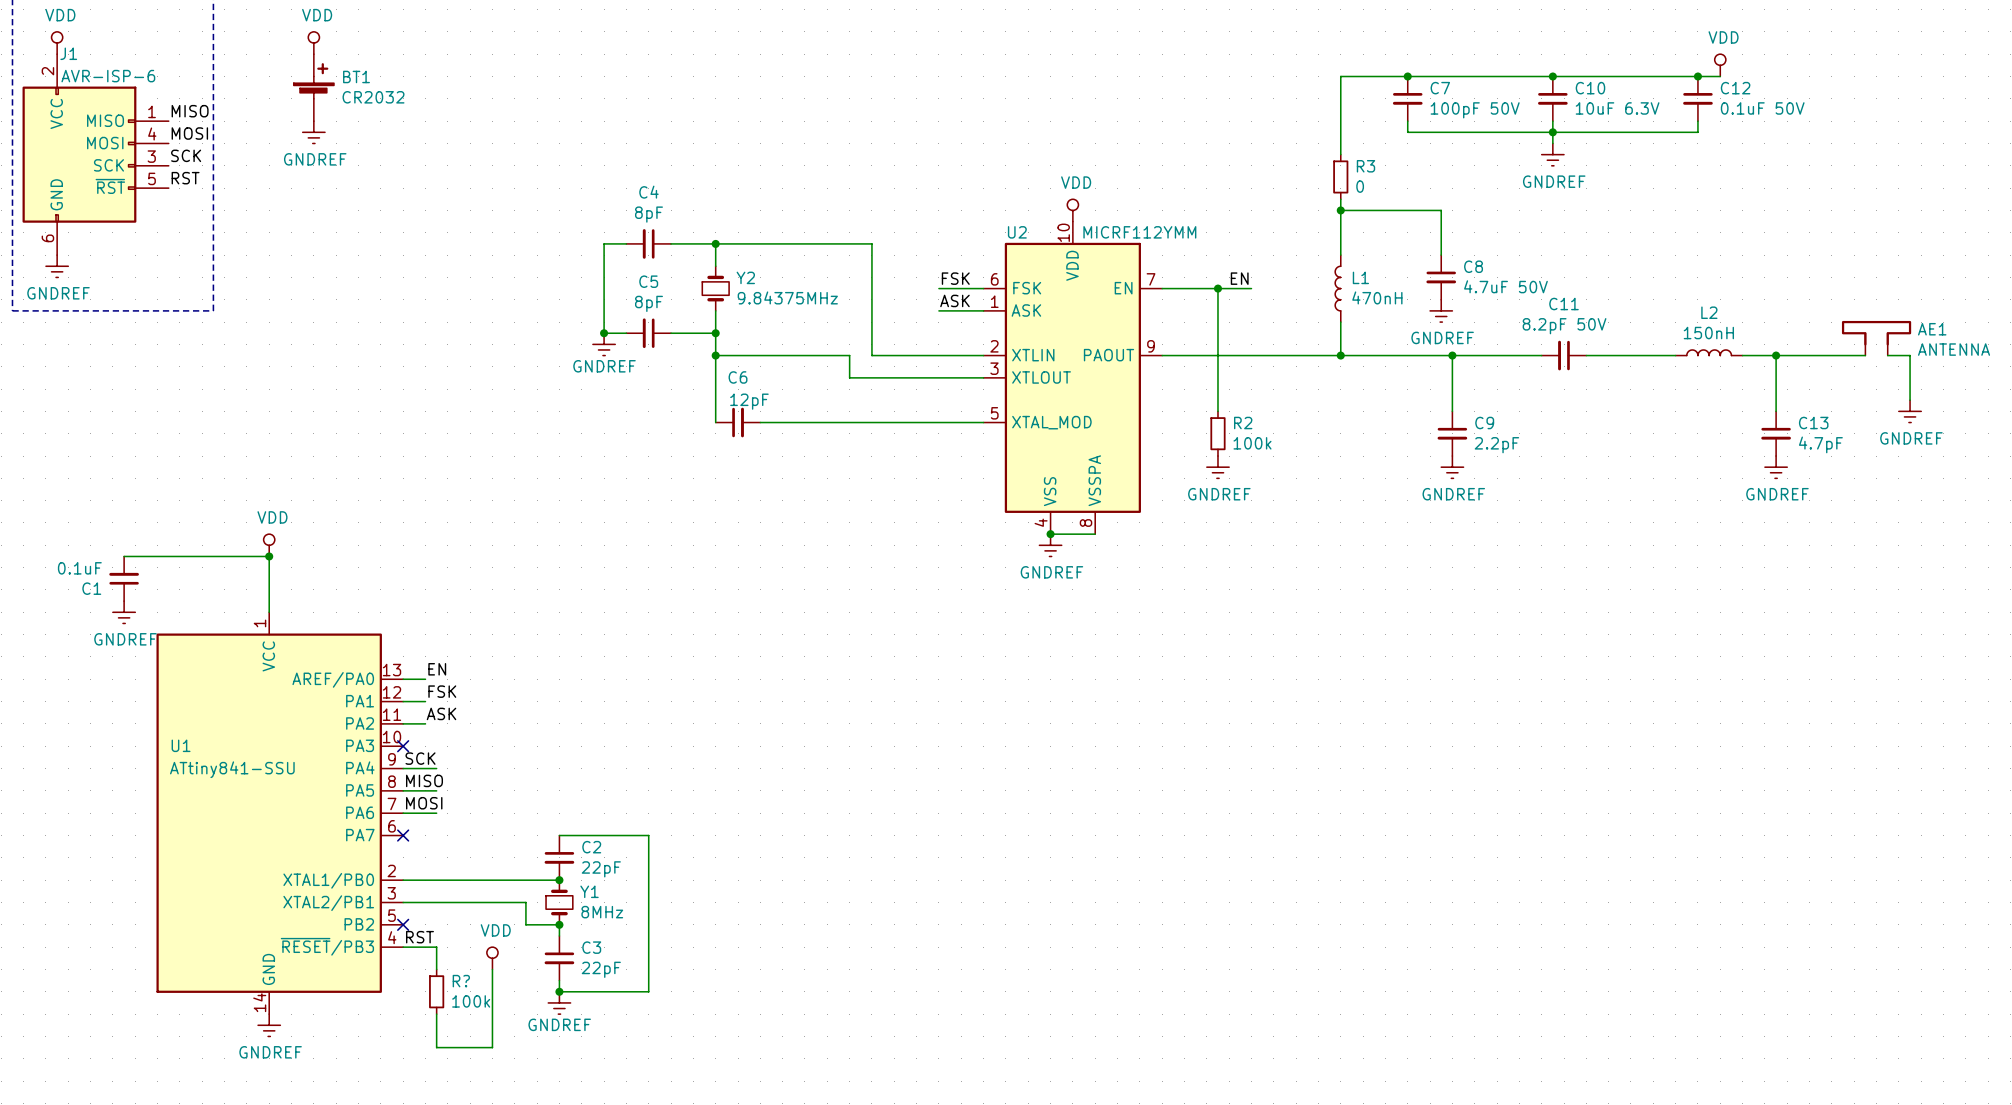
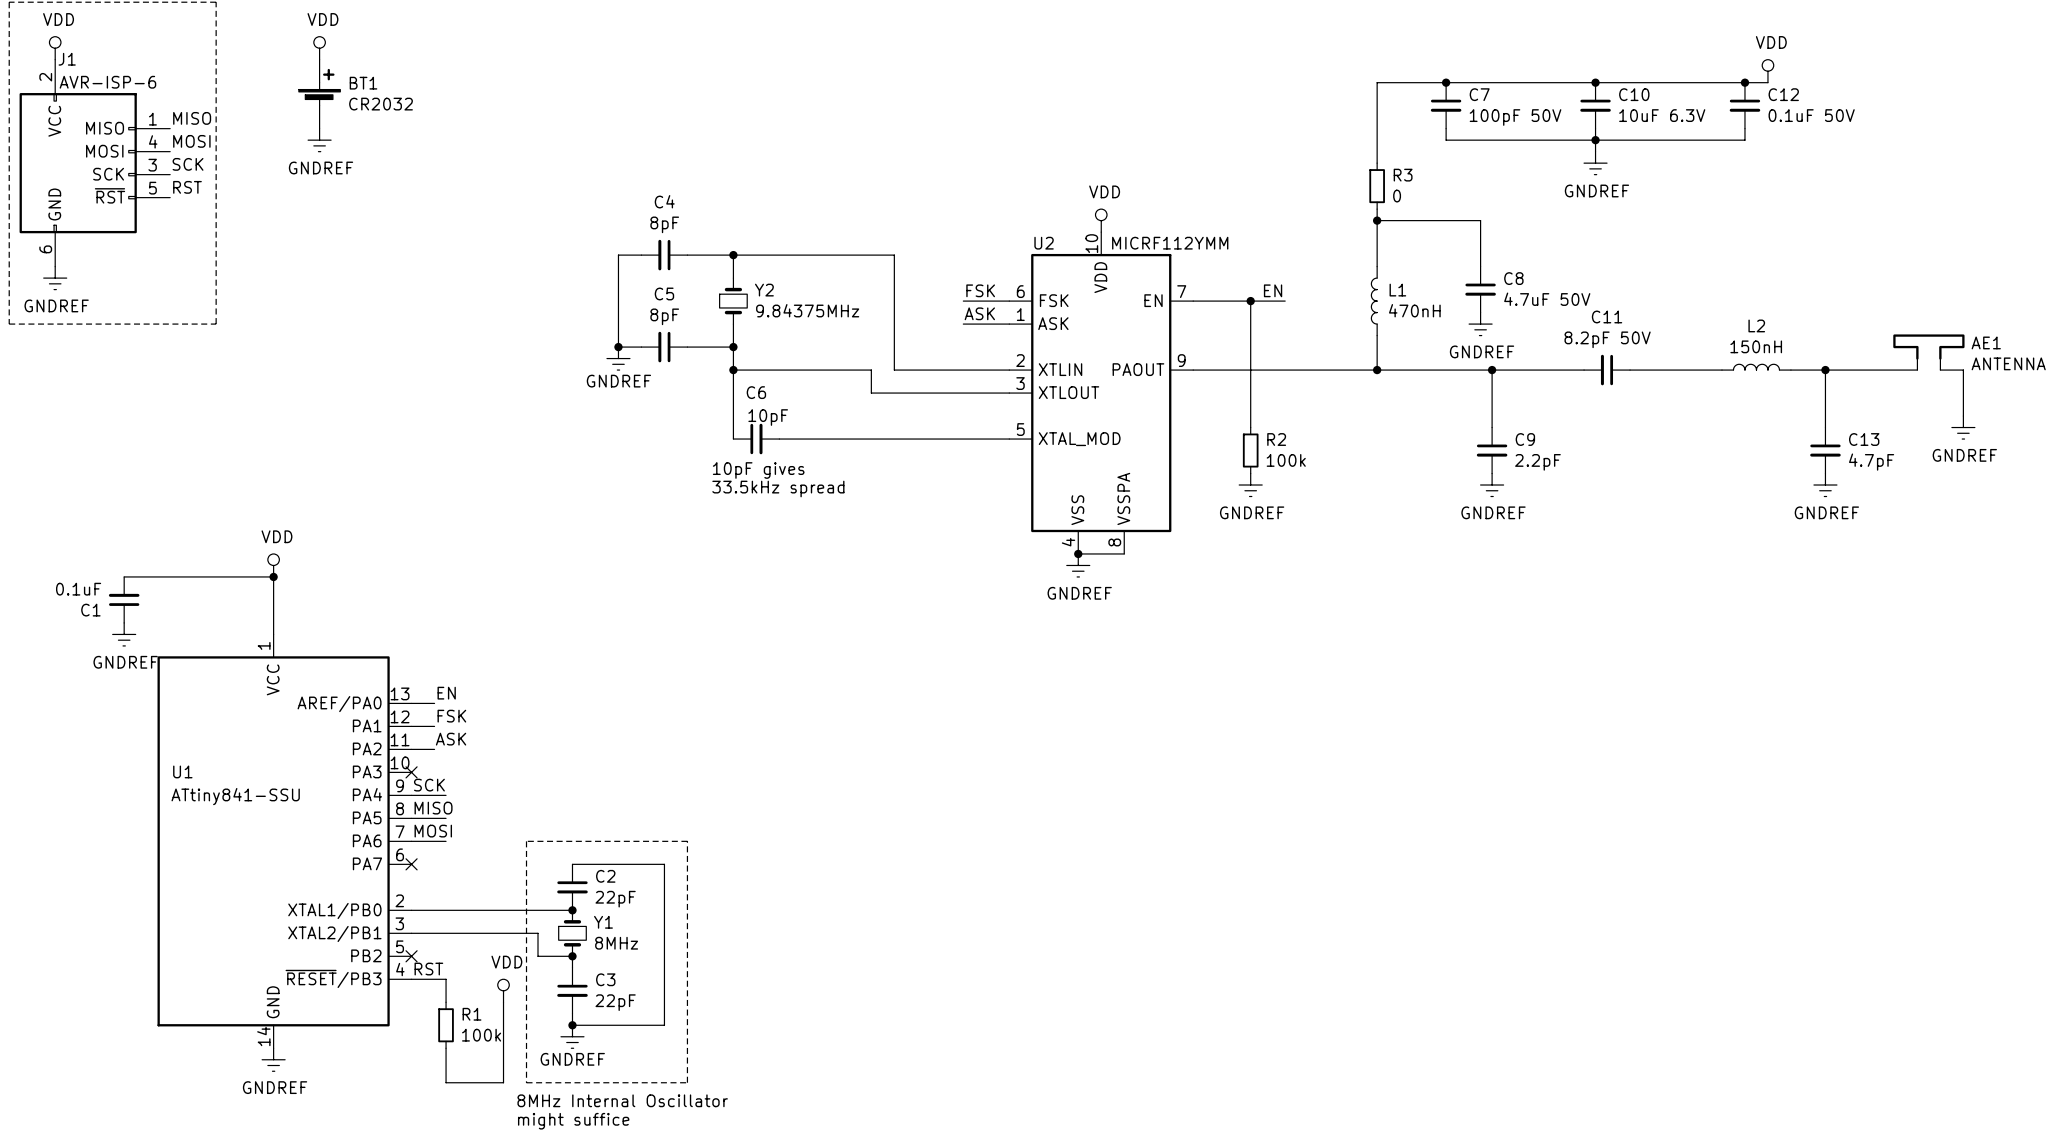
C6 value: 12pF (749, 401) -> 10pF (768, 417)
text: none -> 10pF gives (758, 470)
text: none -> 33.5kHz spread (778, 489)
line: none -> (526, 841) (526, 1082) (687, 1082) (687, 841) (526, 841)
R? name: R? (461, 981) -> R1 (472, 1014)
text: none -> 8MHz Internal Oscillator (622, 1100)
text: none -> might suffice (573, 1121)

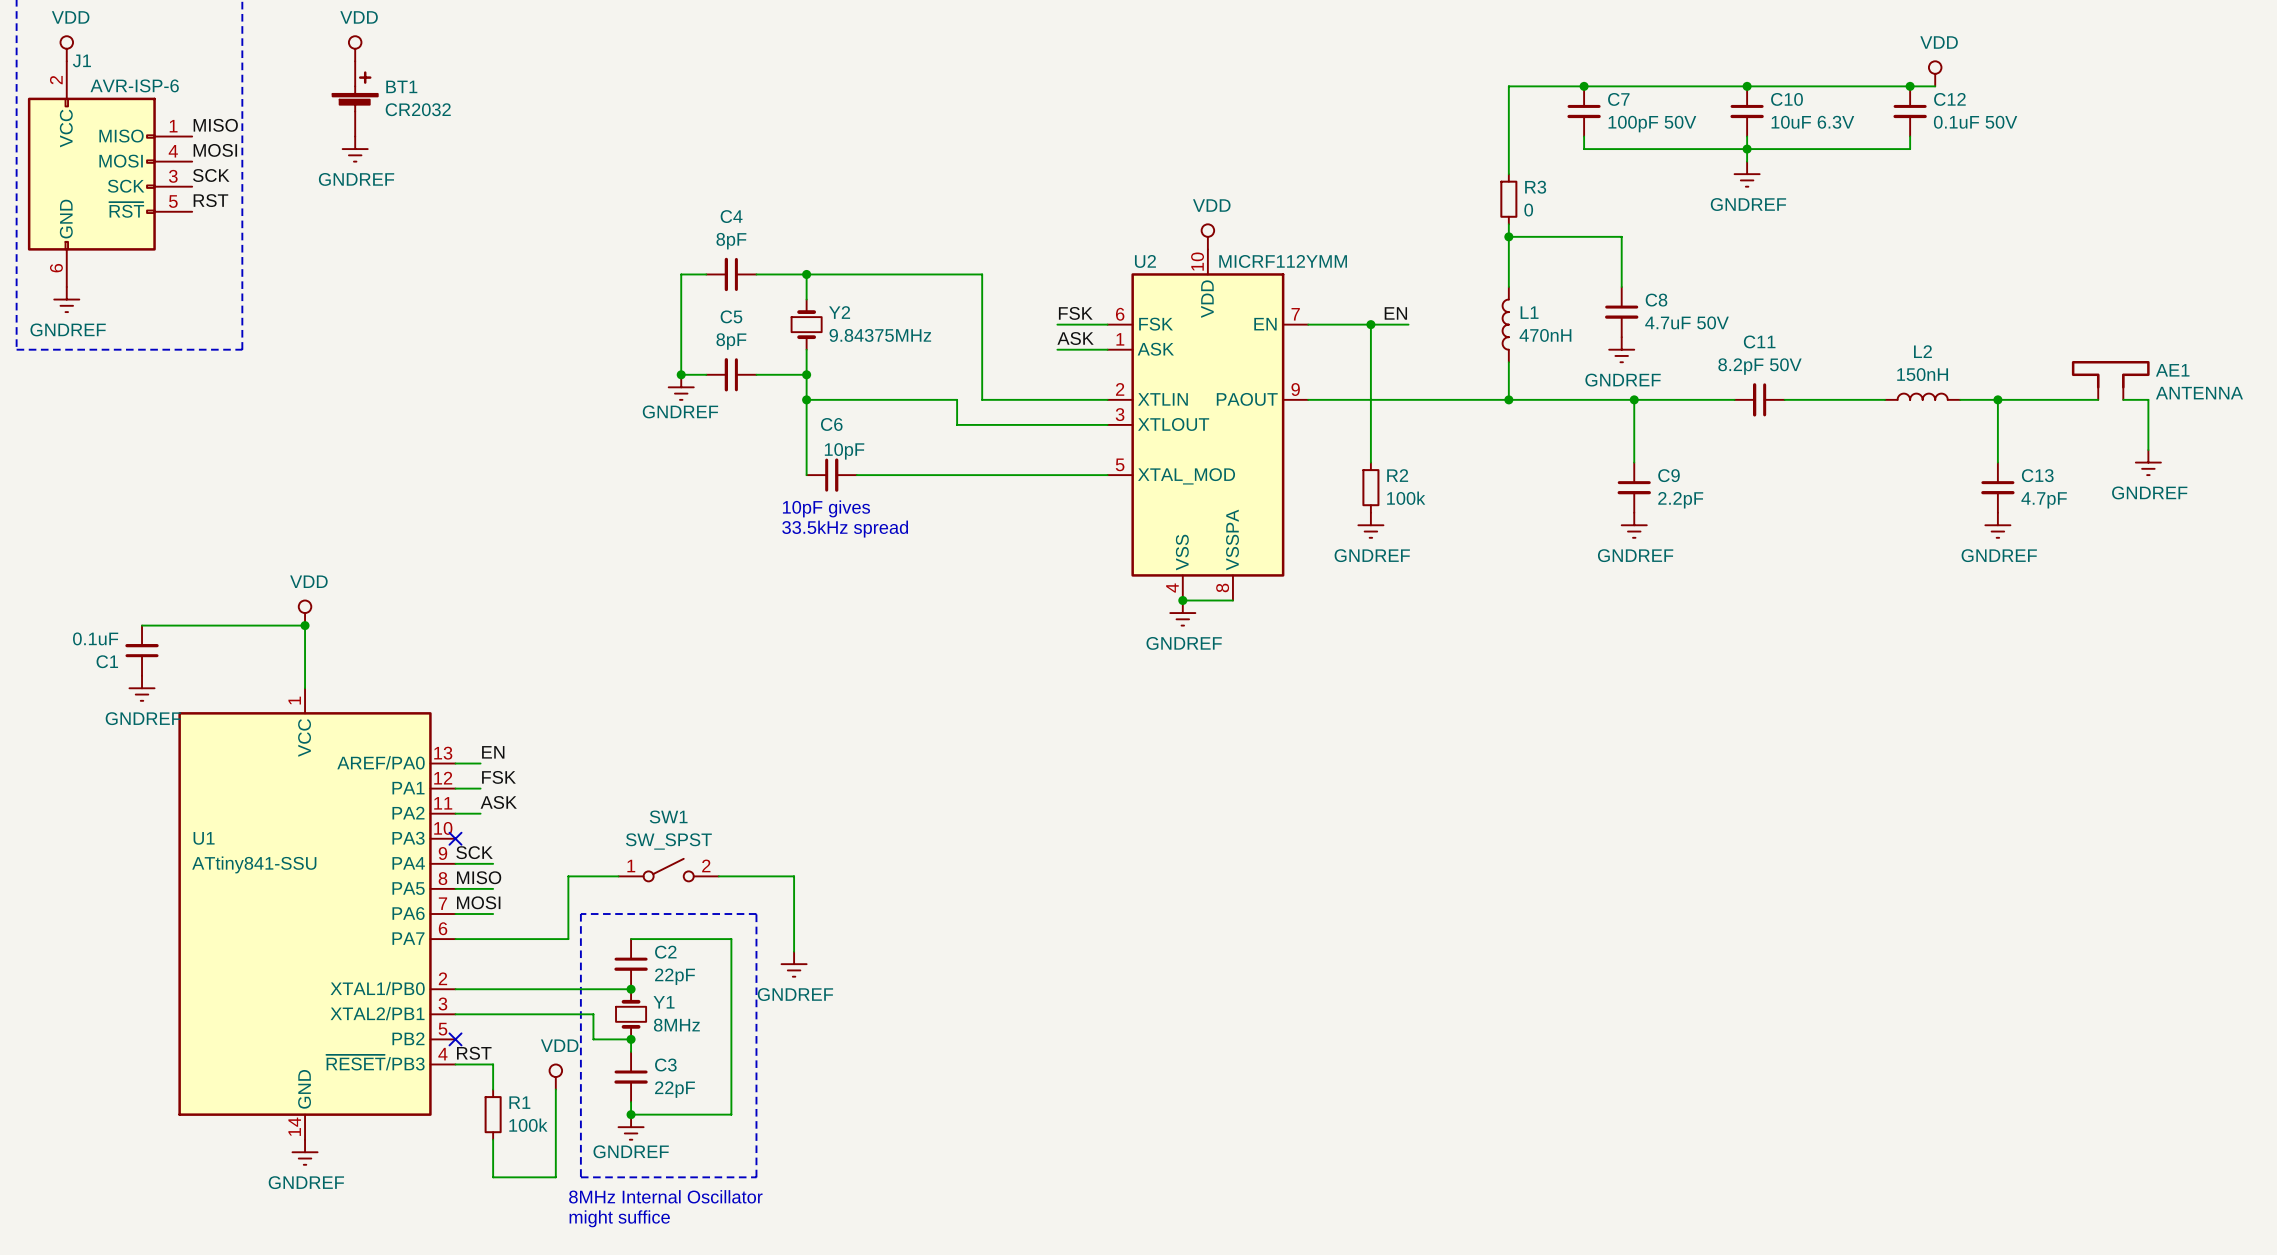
SW1: none -> SW_SPST (668, 870)
wire: none -> (618, 876) (568, 876) (568, 939) (455, 939)
wire: none -> (718, 876) (794, 876) (794, 951)
no-connect mark: (411, 864) -> none
power symbol: none -> GNDREF (794, 964)

